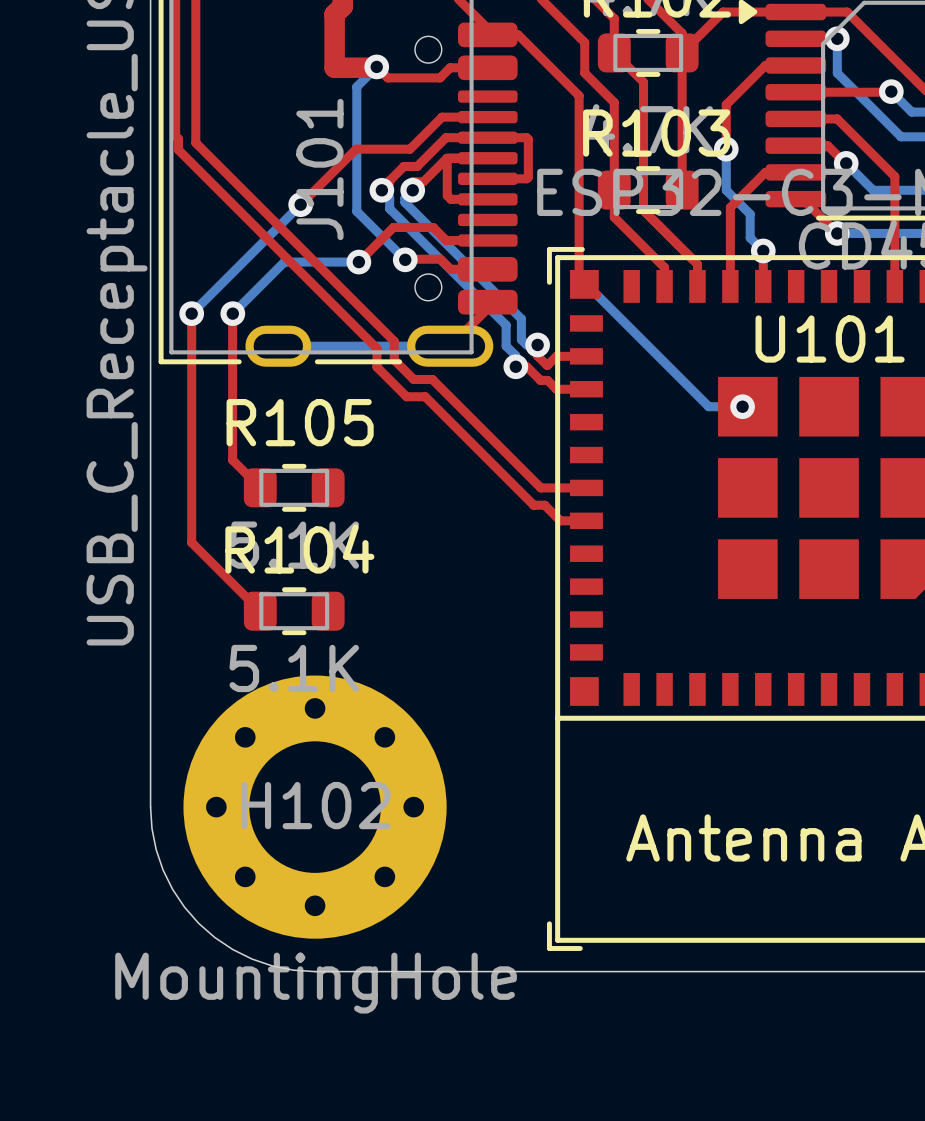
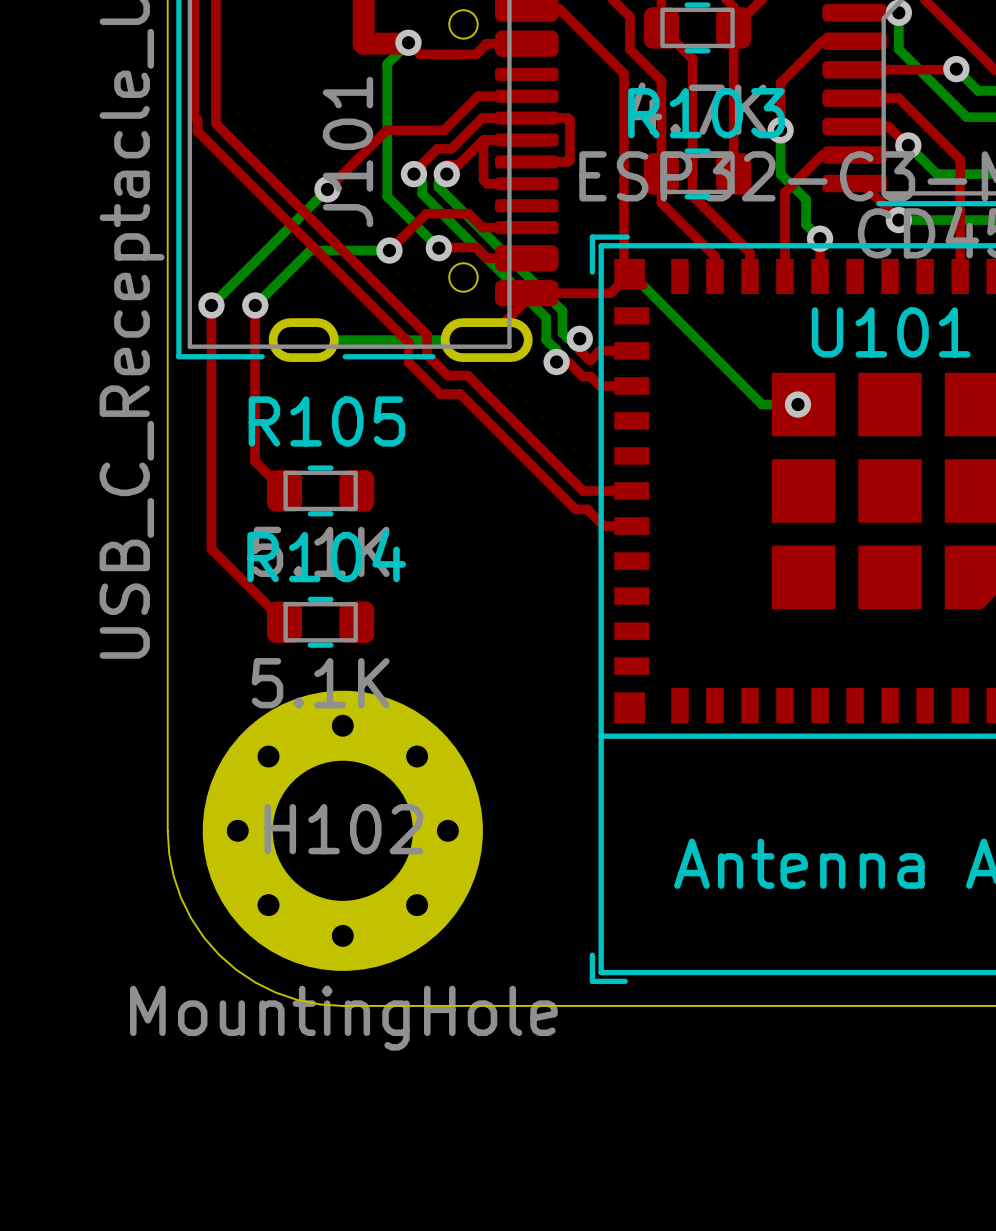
top track: none -> (629, 274) (610, 293) (526, 293)

